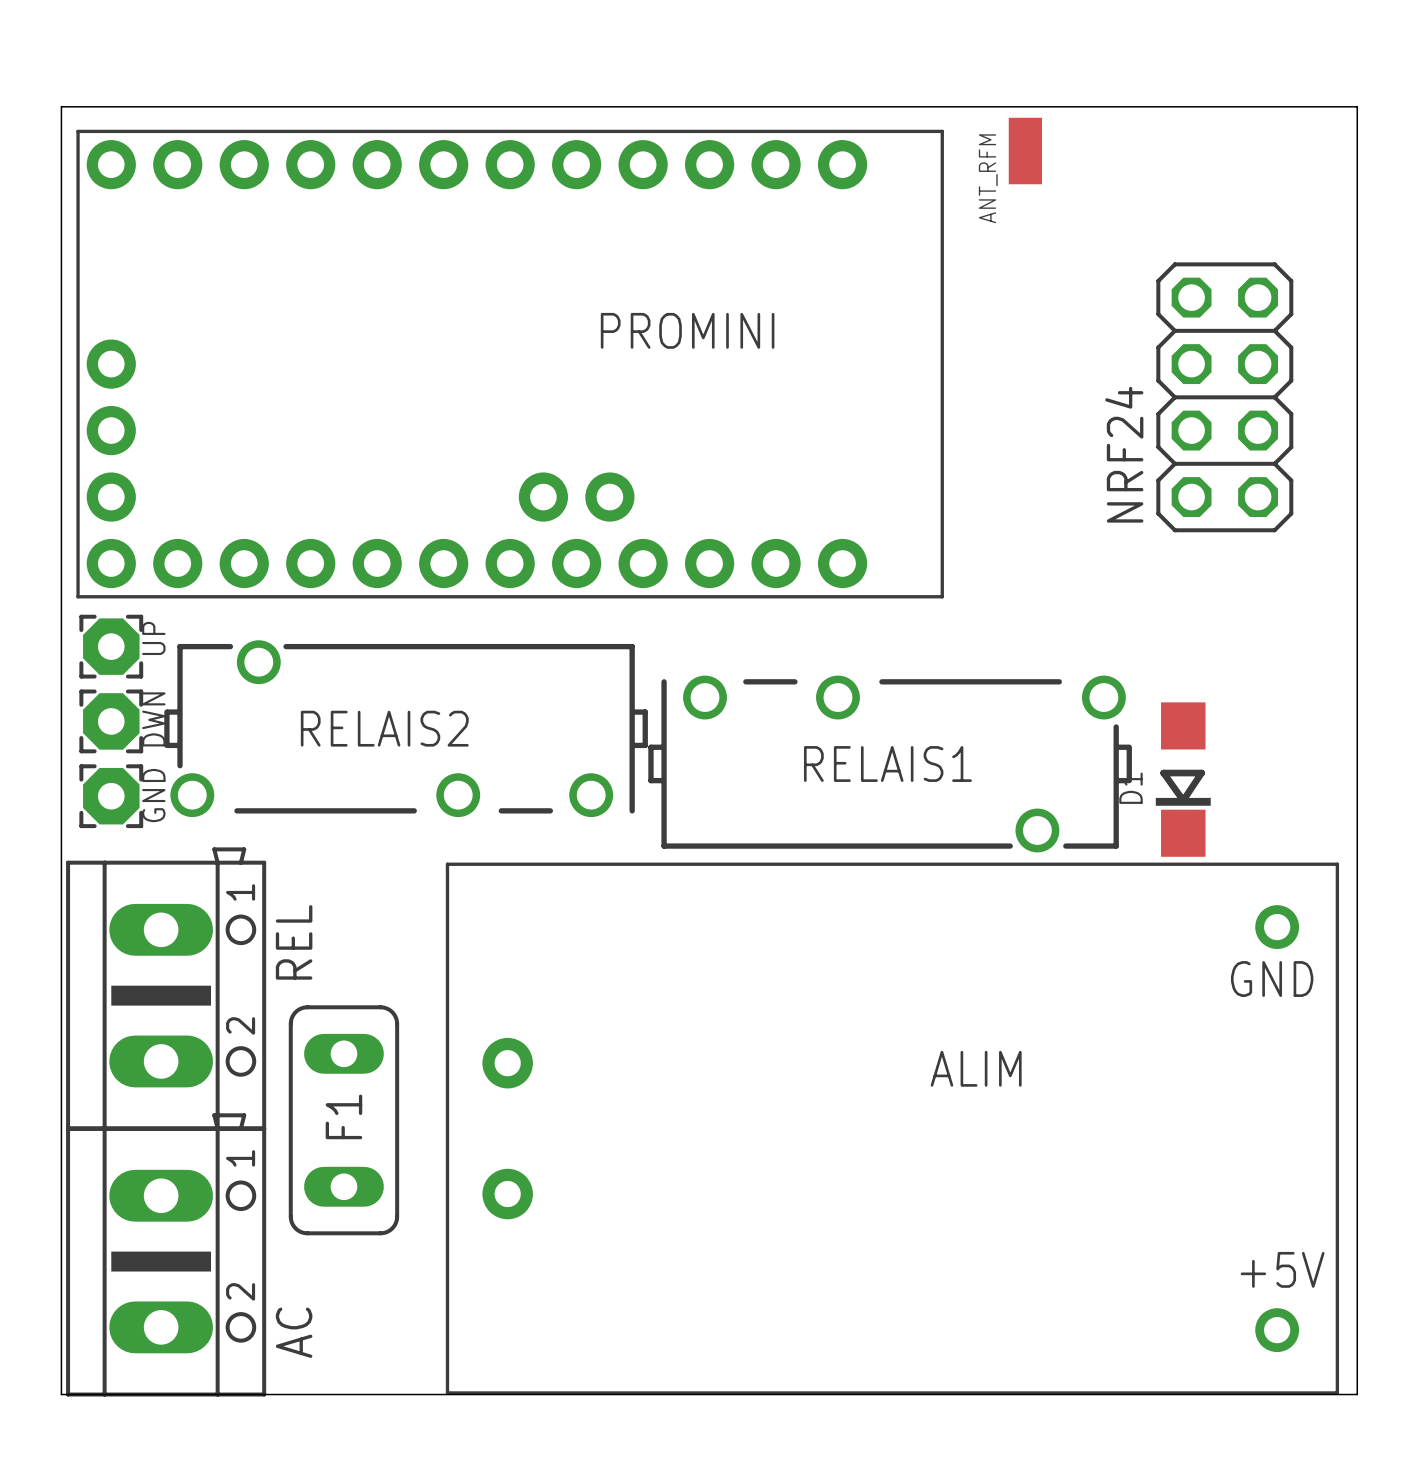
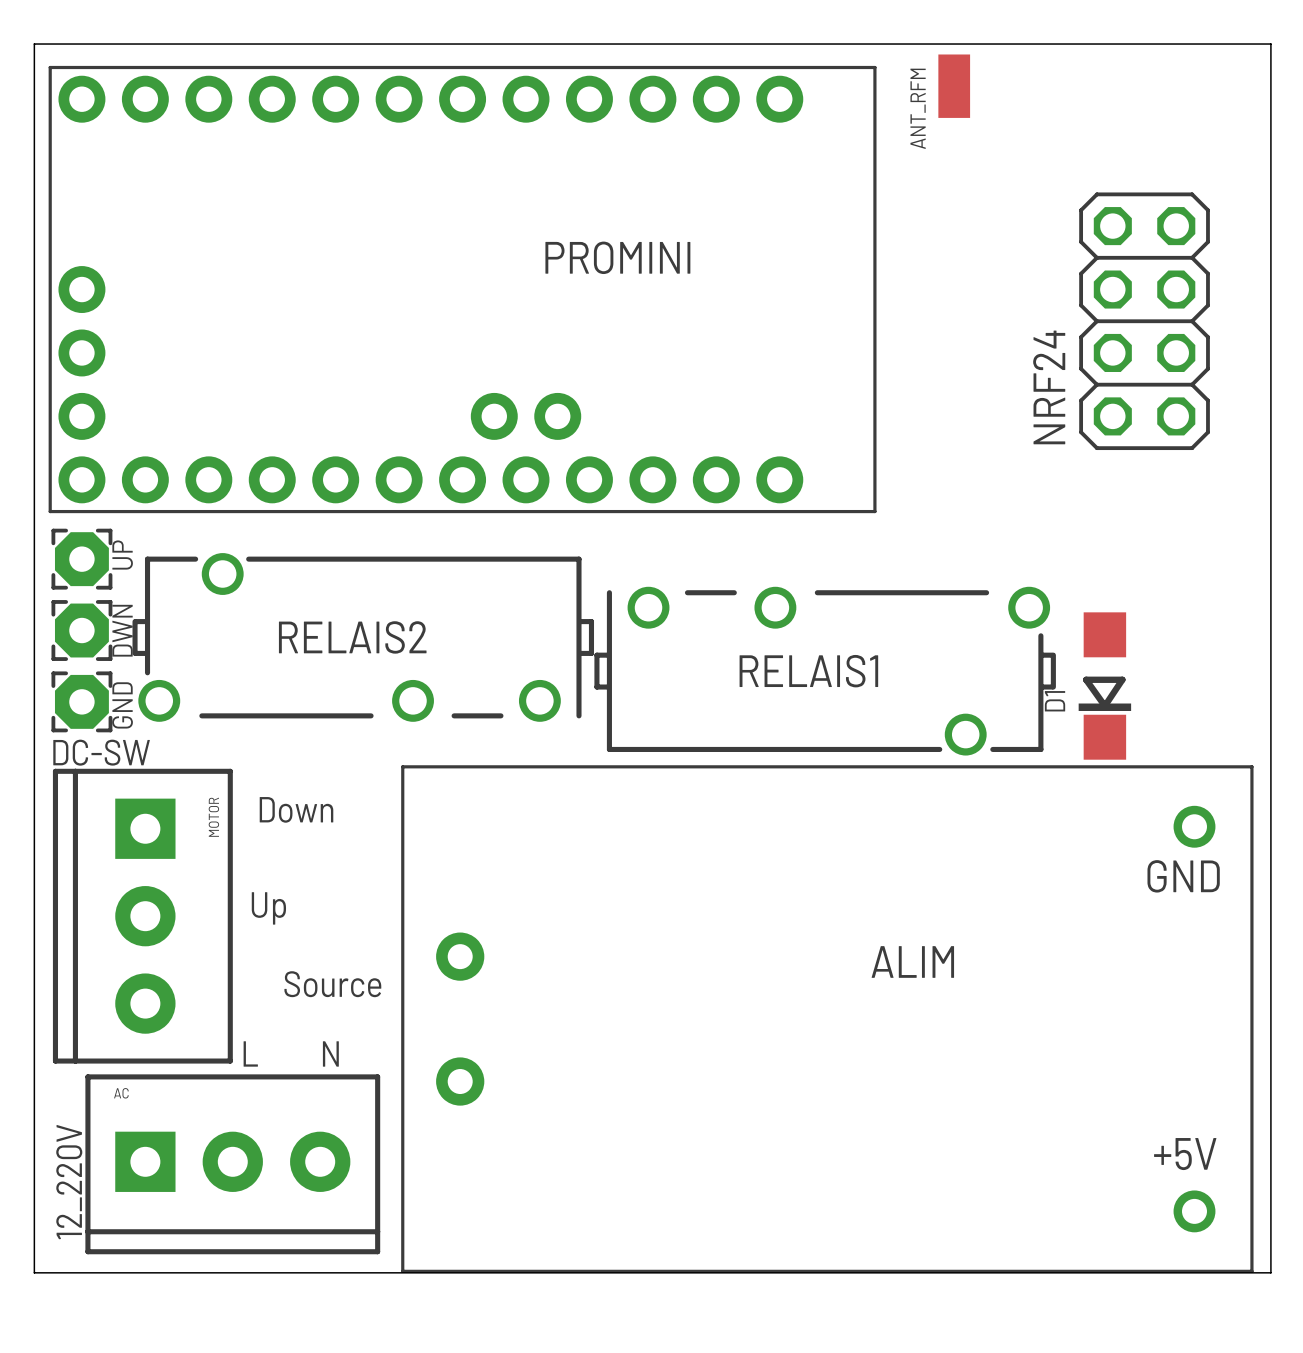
text: none -> DC-SW (101, 752)
text: none -> Down (296, 809)
REL: (166, 988) -> none
text: none -> Up (268, 908)
MOTOR: none -> (142, 916)
text: none -> Source (332, 984)
F1: (343, 1120) -> none
text: none -> L (250, 1053)
text: none -> N (330, 1053)
AC: (166, 1254) -> none
AC: none -> (232, 1164)
text: none -> 12_220V (69, 1182)

